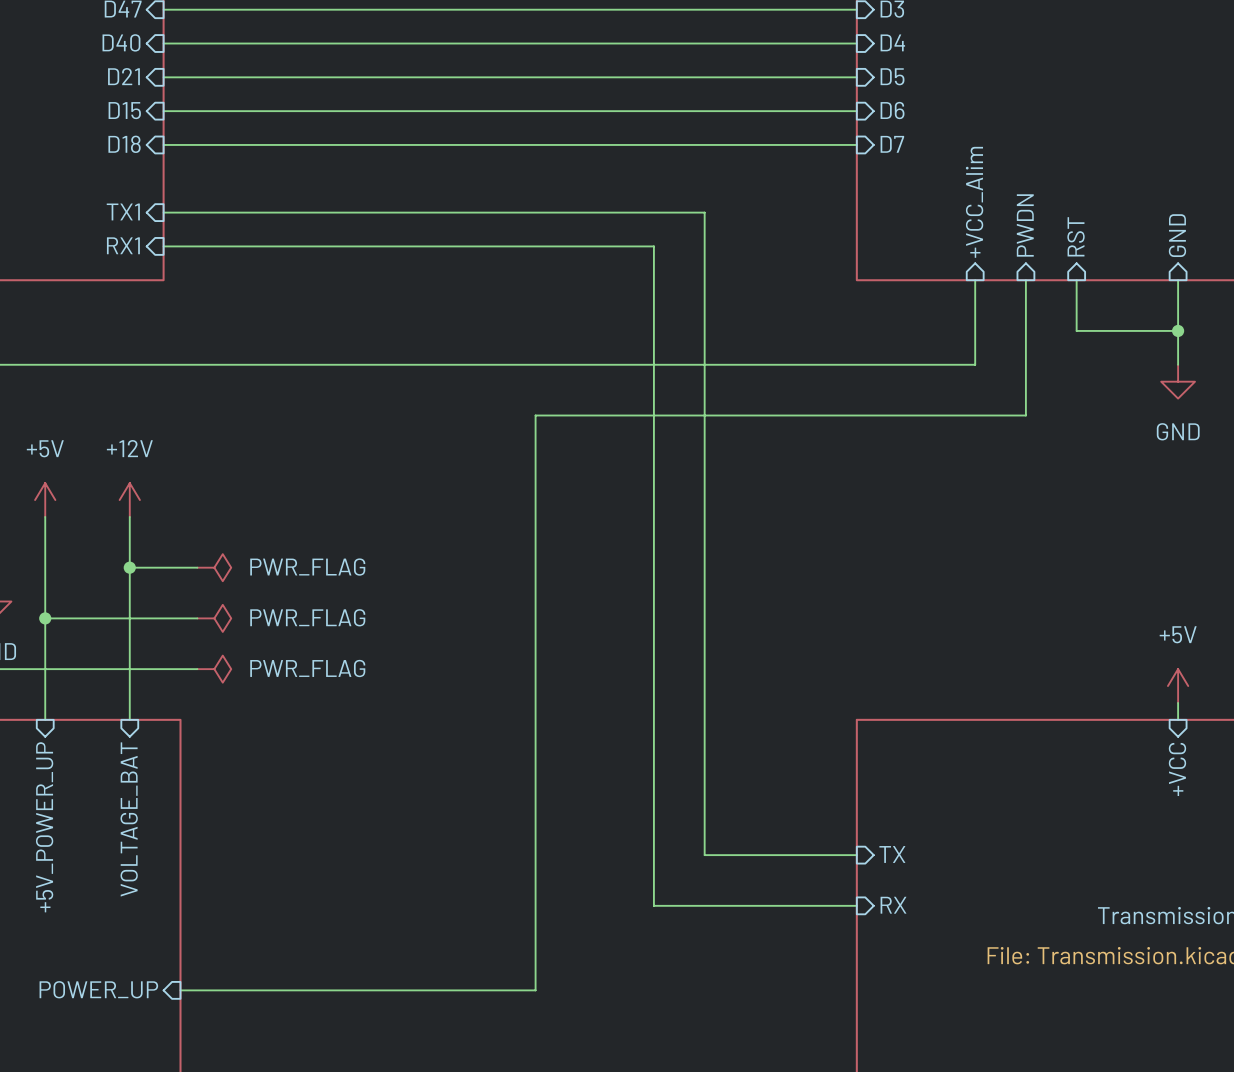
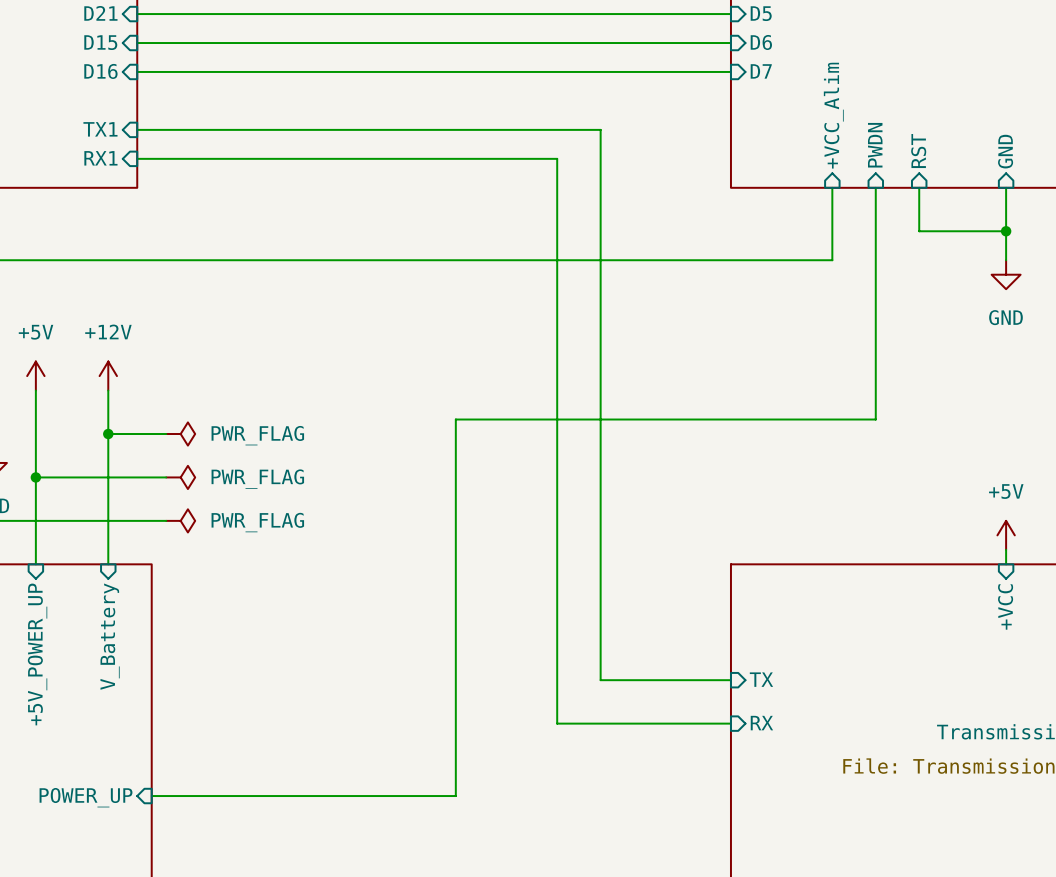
sheet pin: D18 (124, 144) -> D16 (100, 71)
wire: (1025, 415) (535, 415) (535, 550) -> (875, 303) (875, 419) (455, 419)
sheet pin: VOLTAGE_BAT (129, 819) -> V_Battery (110, 636)

